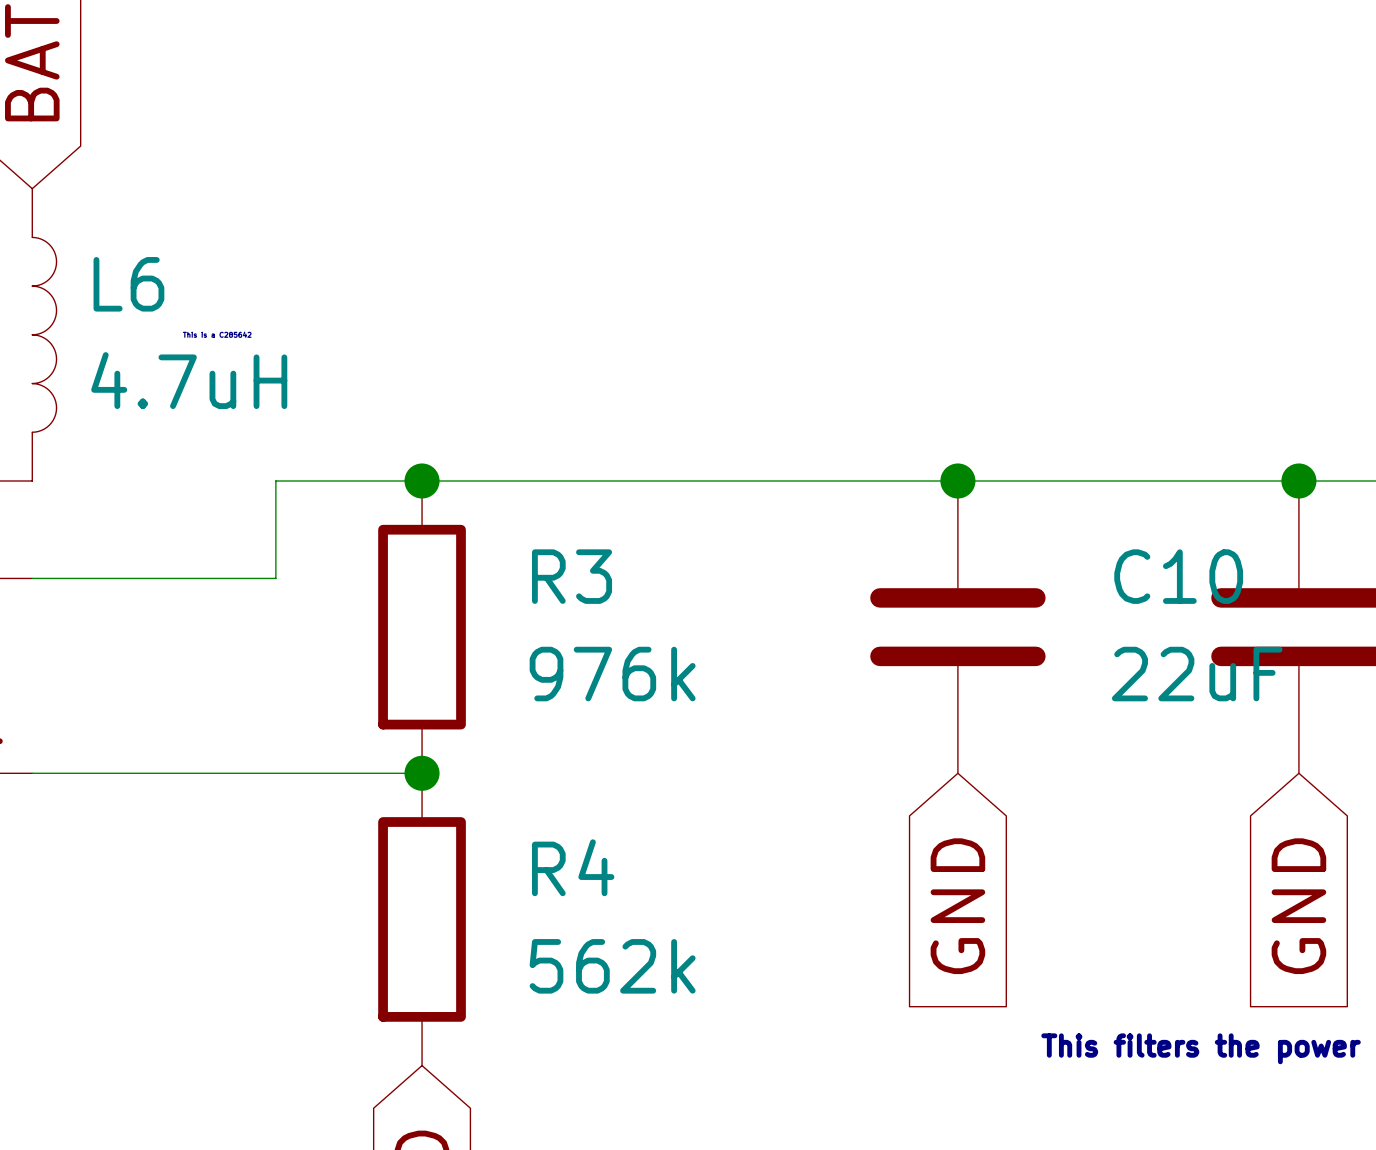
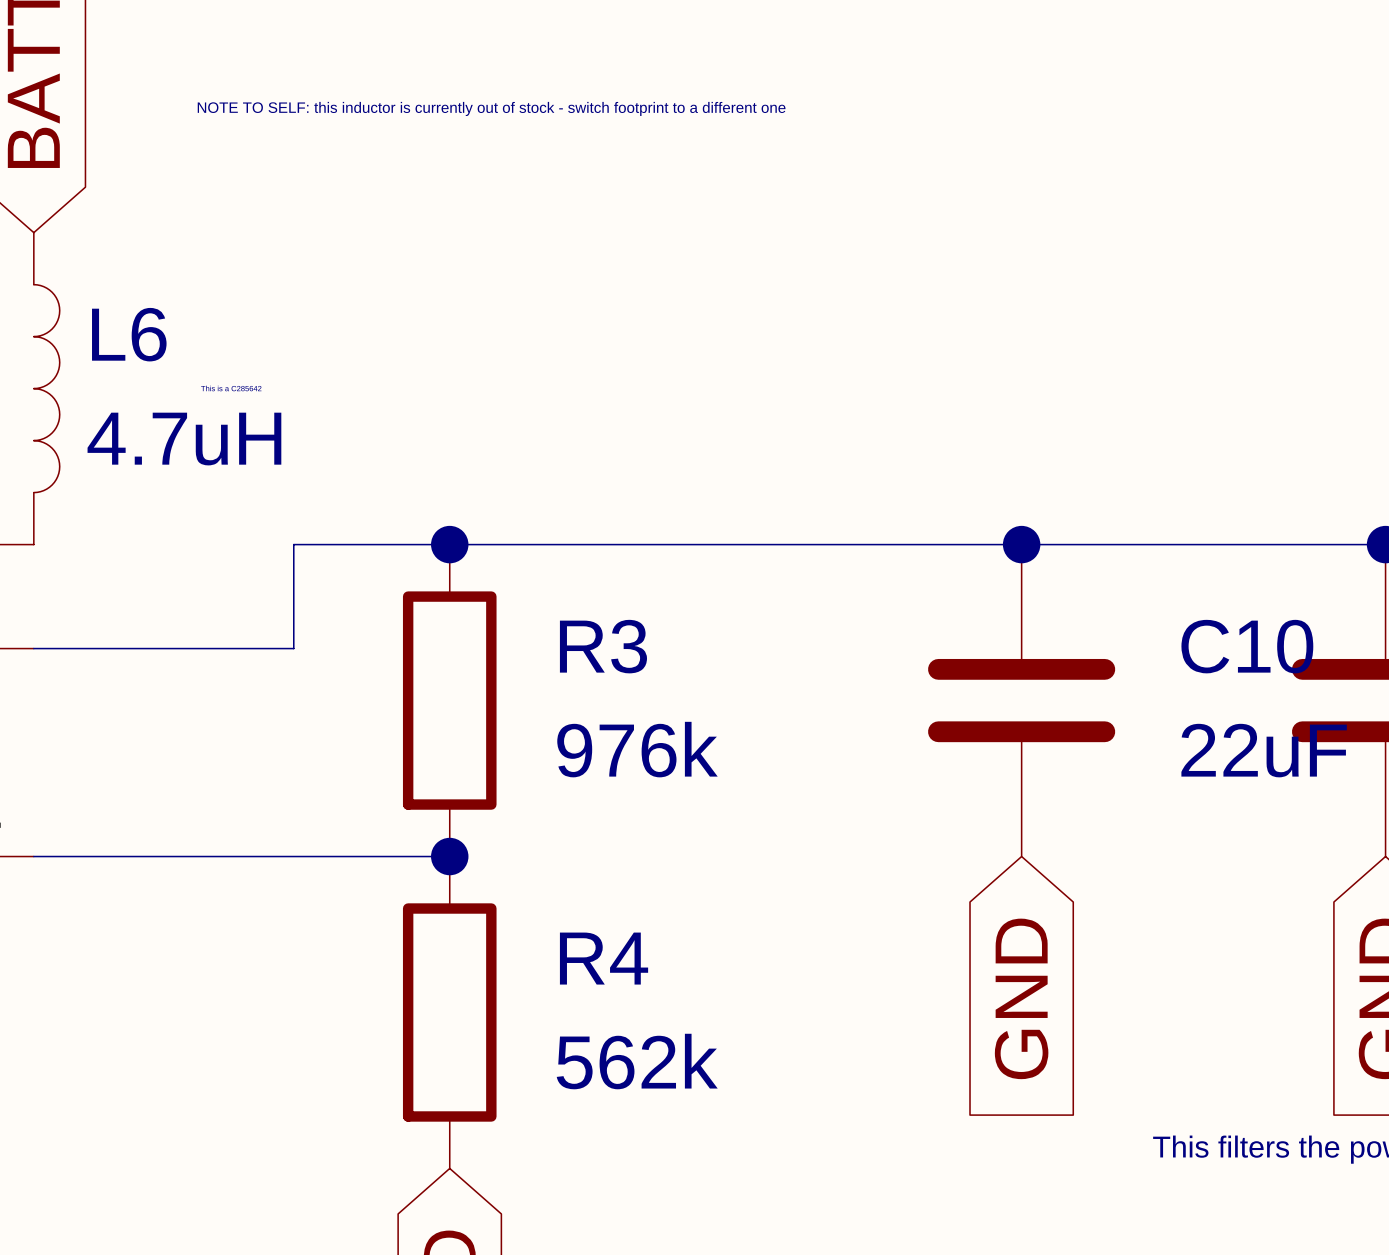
text: none -> NOTE TO SELF: this inductor is currently out of stock - switch footprint to a different one (491, 108)

